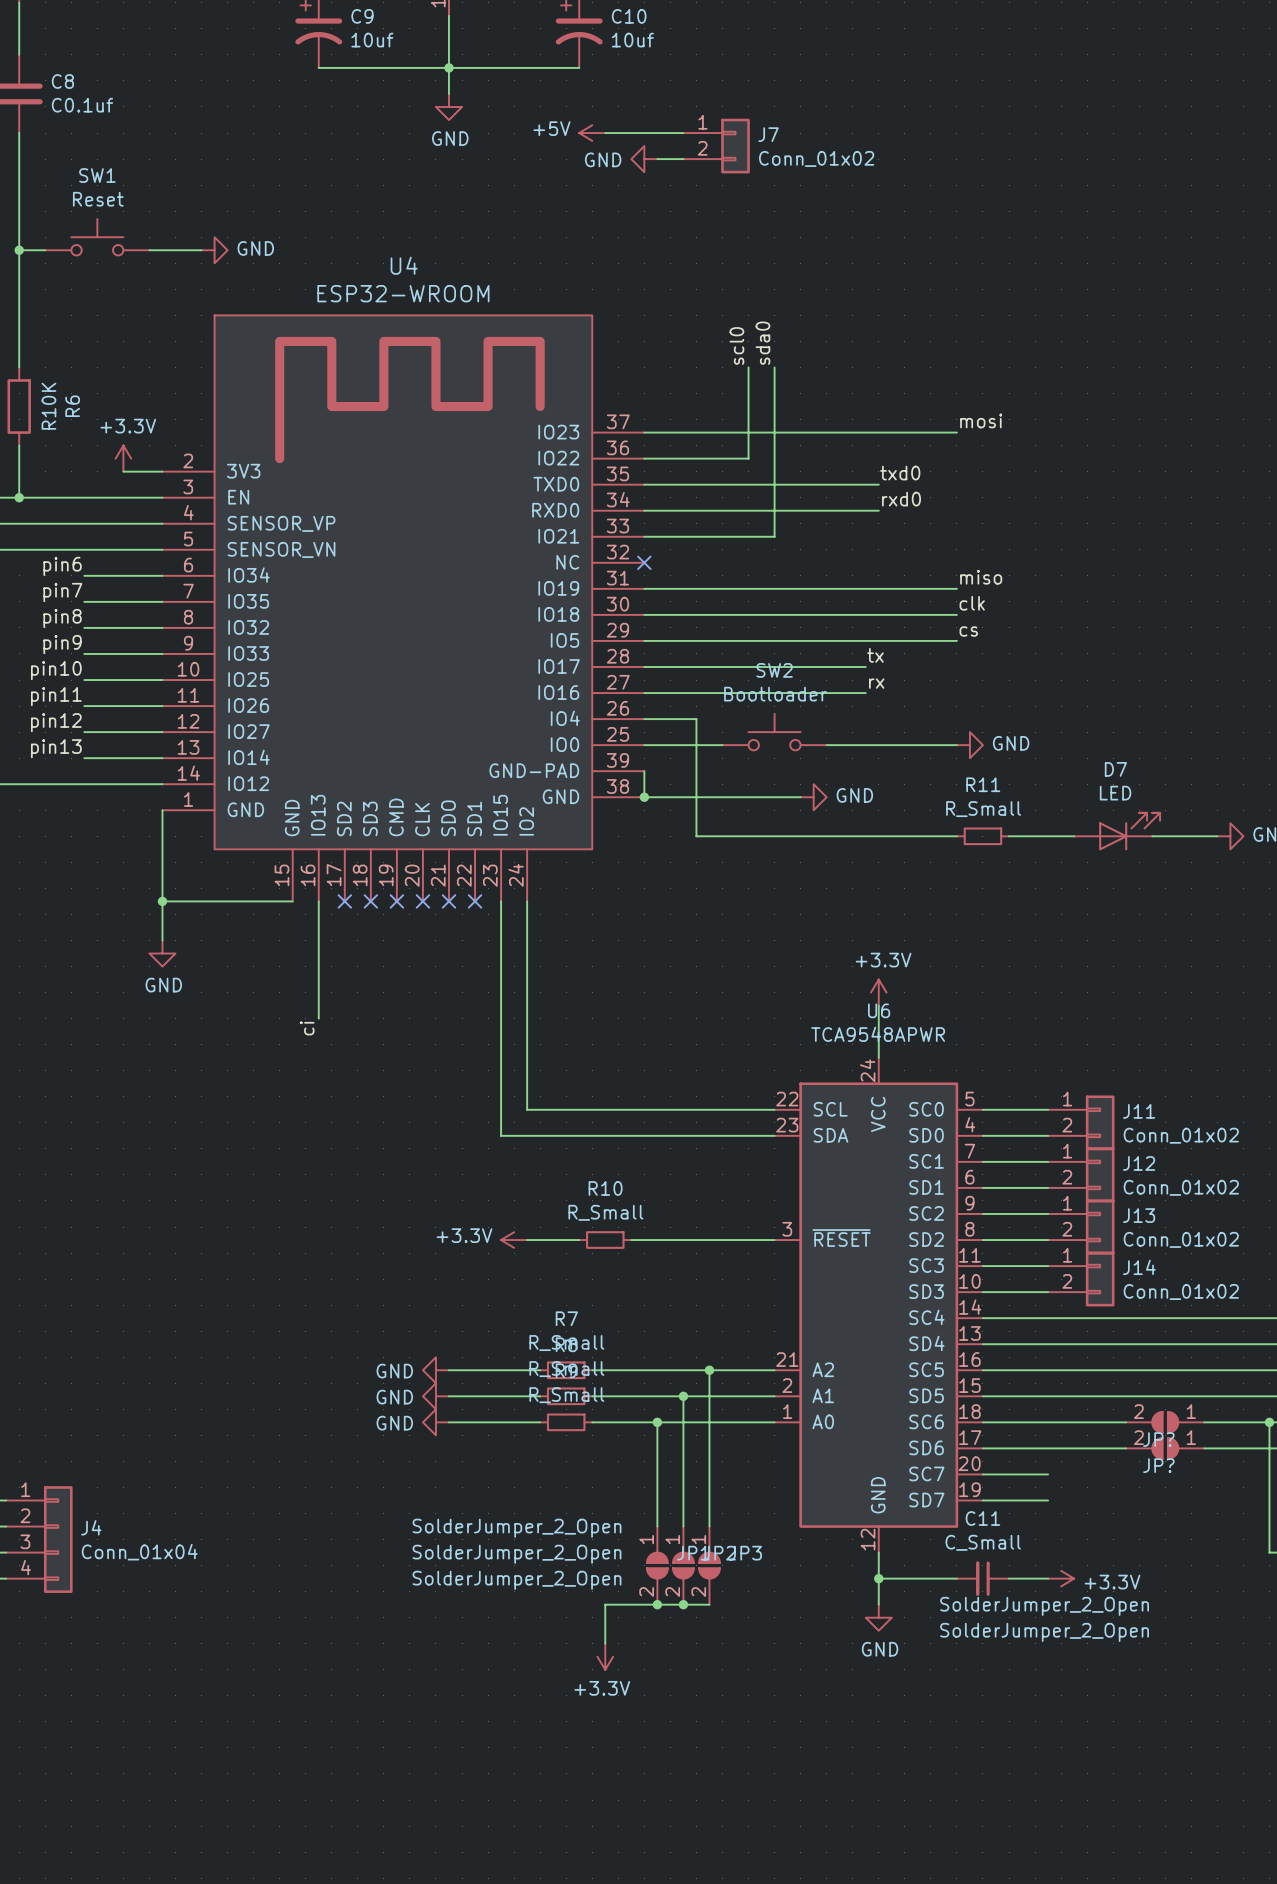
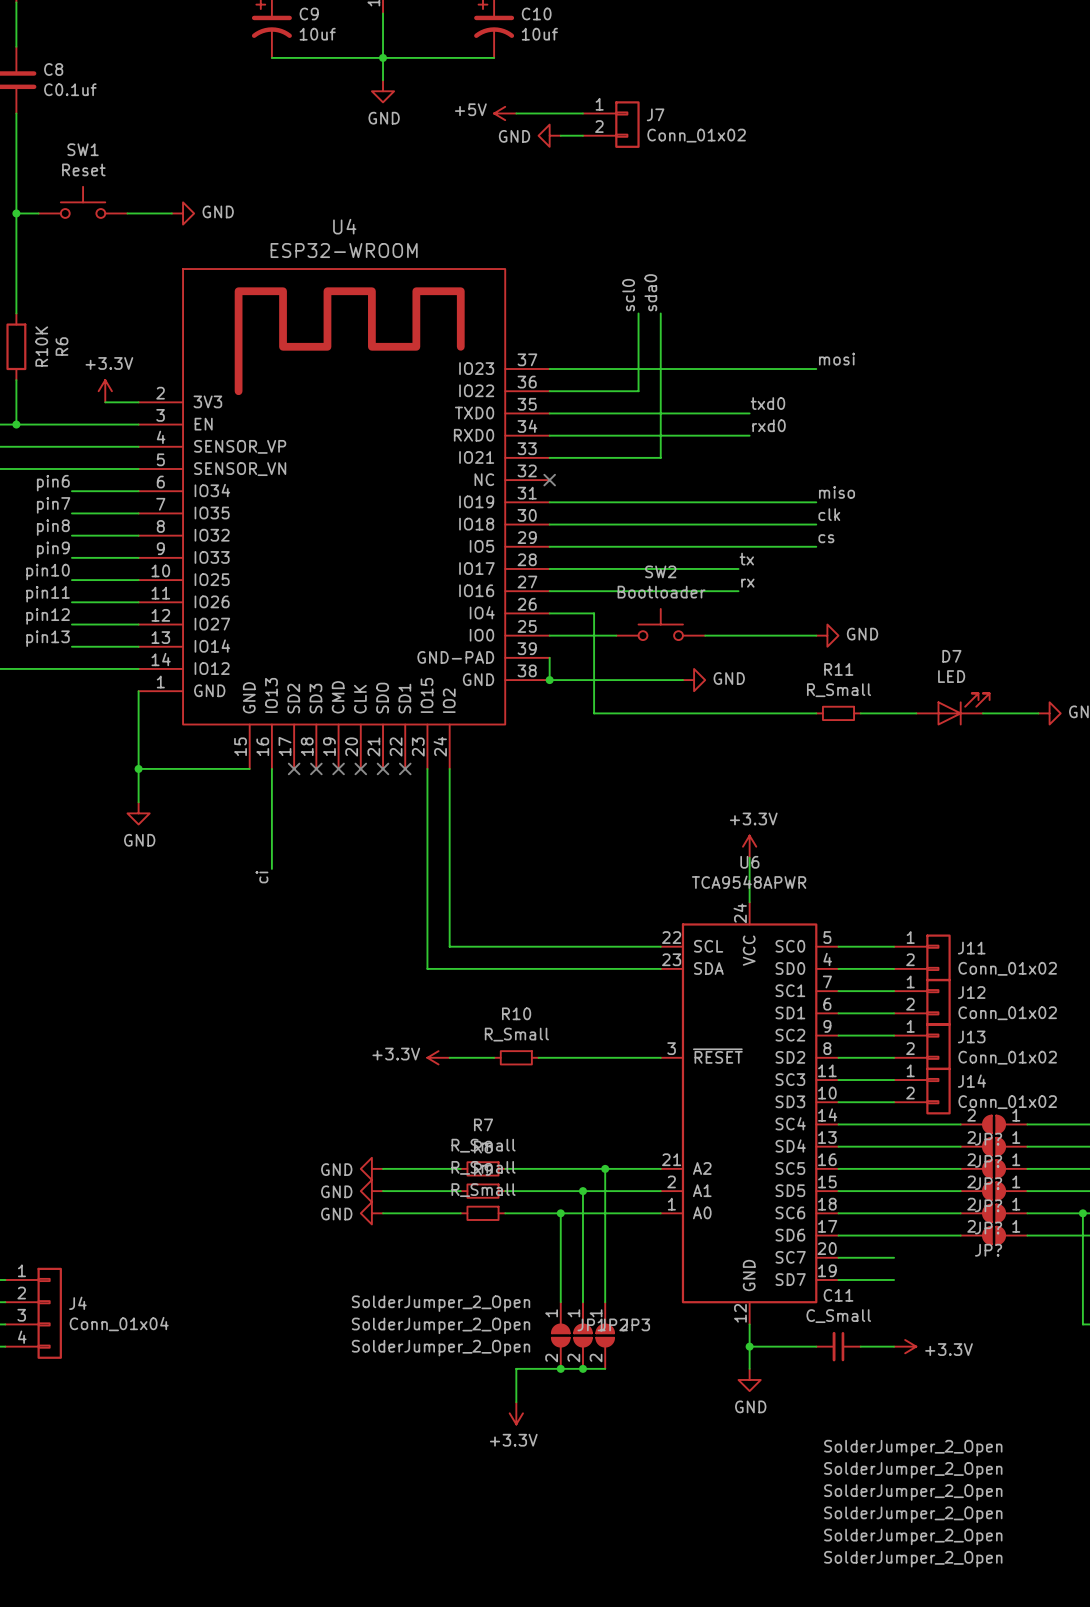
JP?: none -> SolderJumper_2_Open (994, 1124)
JP?: none -> SolderJumper_2_Open (994, 1146)
JP?: none -> SolderJumper_2_Open (994, 1168)
JP?: none -> SolderJumper_2_Open (994, 1191)
JP? value position: SolderJumper_2_Open (1044, 1606) -> SolderJumper_2_Open (913, 1448)
JP? value position: SolderJumper_2_Open (1044, 1632) -> SolderJumper_2_Open (913, 1470)

